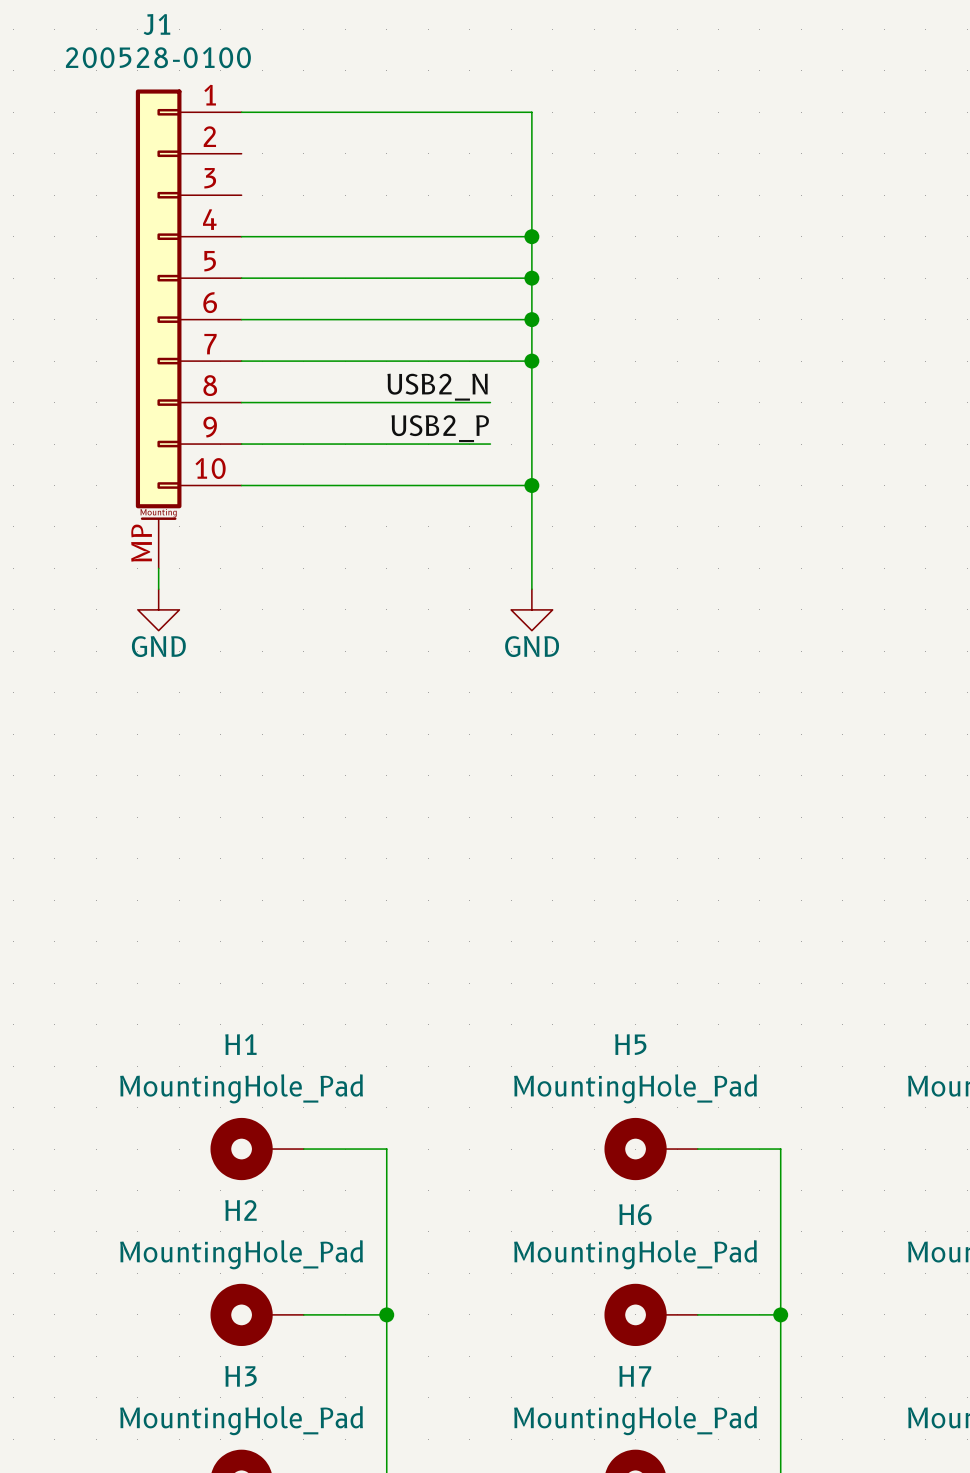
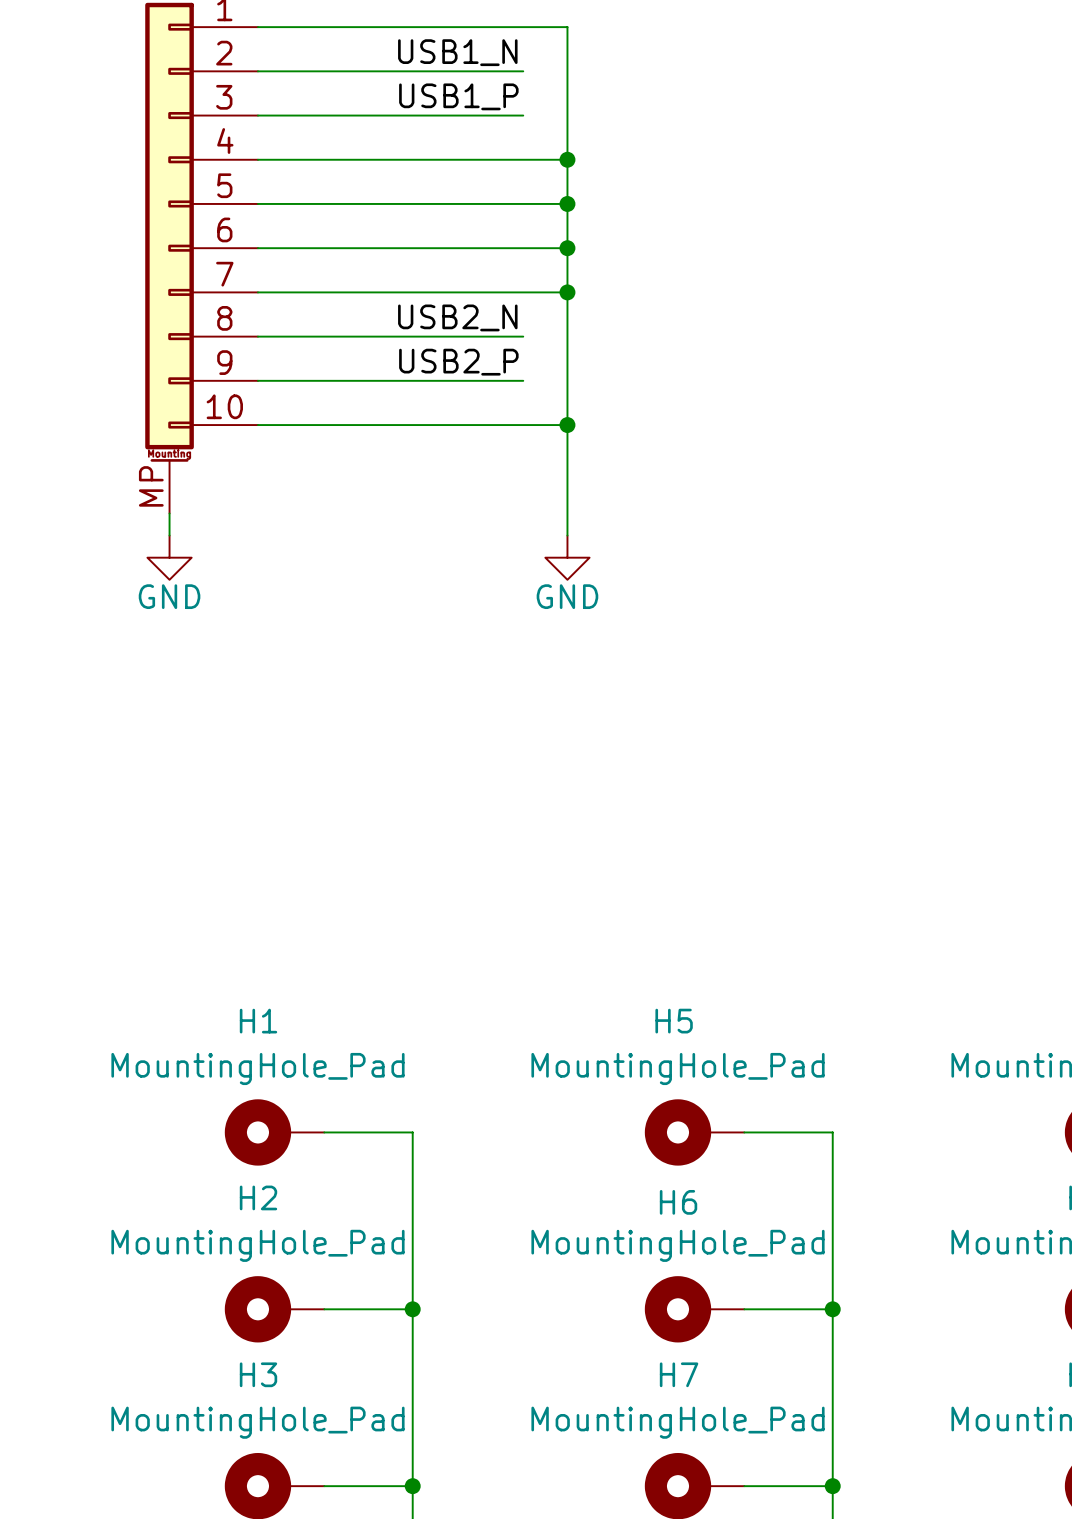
label: none -> USB1_N (457, 52)
wire: none -> (257, 71) (523, 71)
label: none -> USB1_P (458, 96)
wire: none -> (257, 115) (523, 115)

